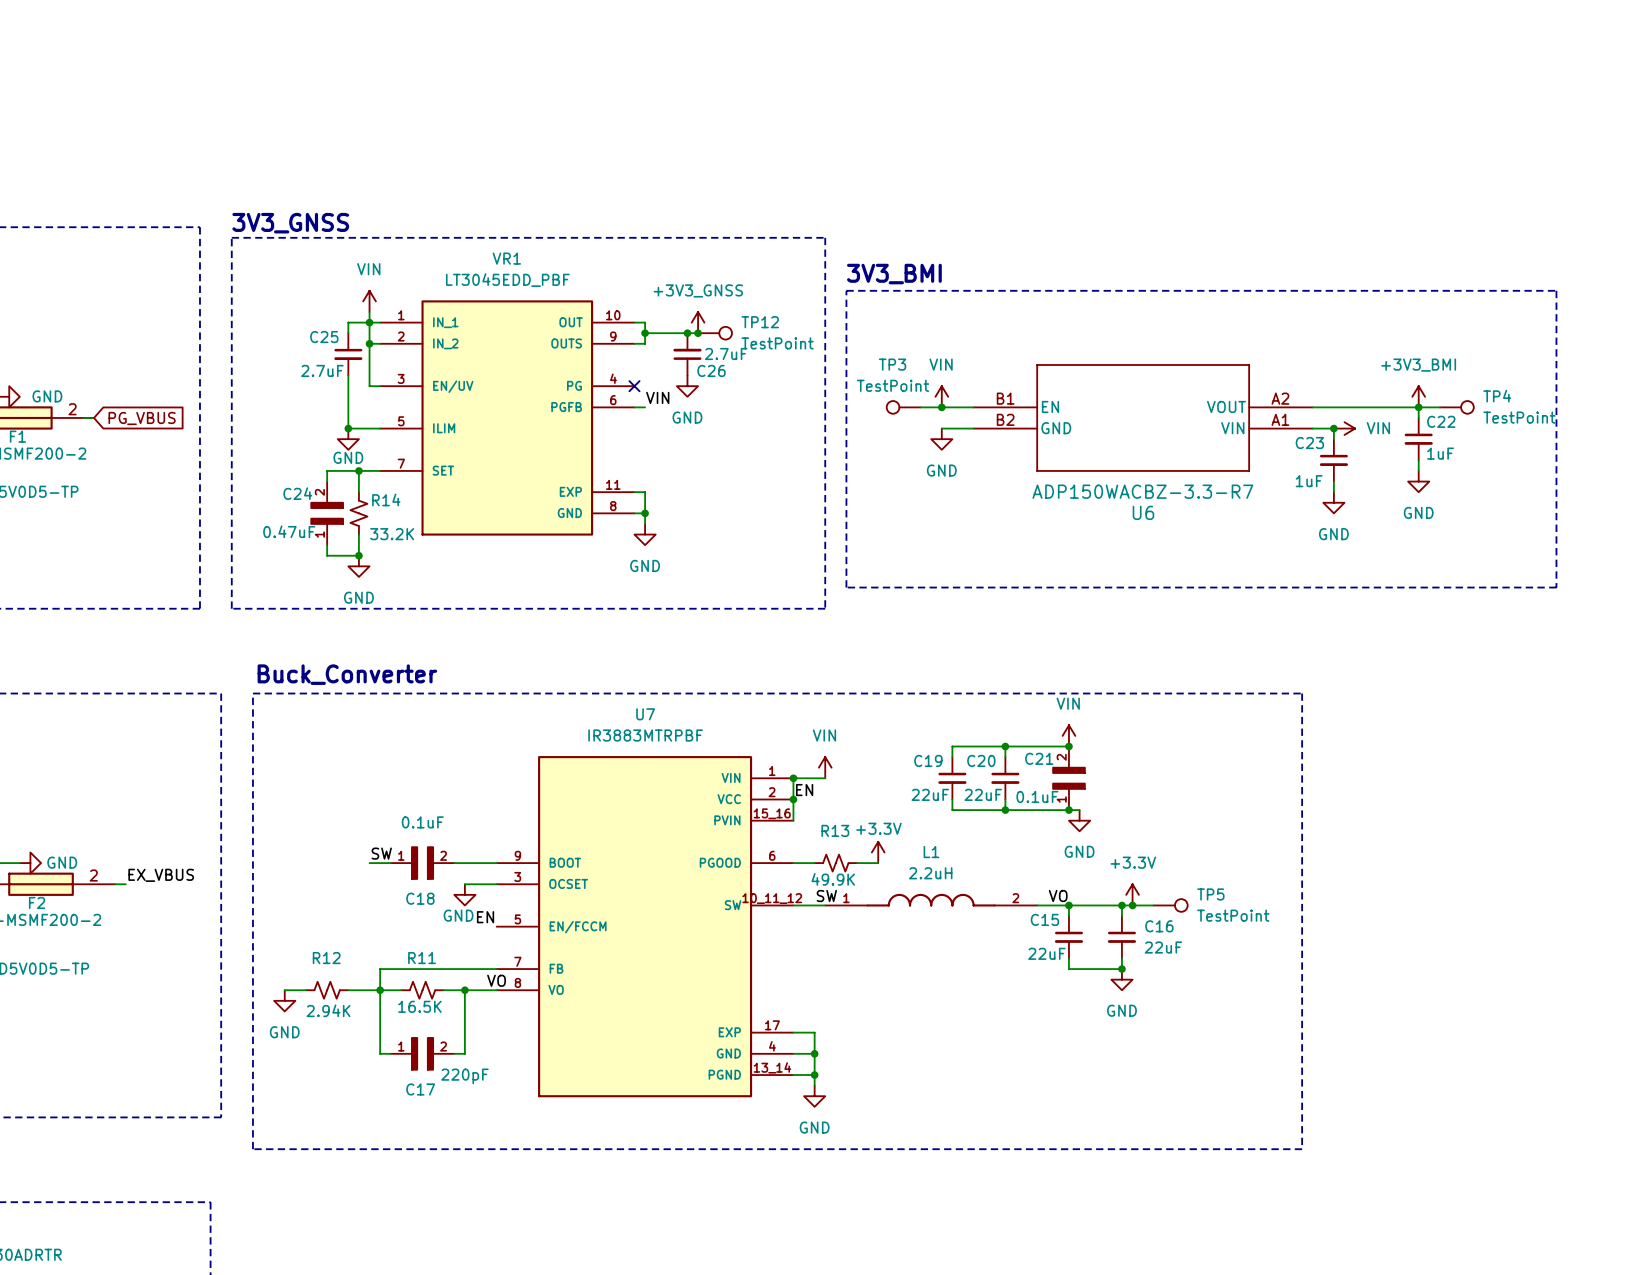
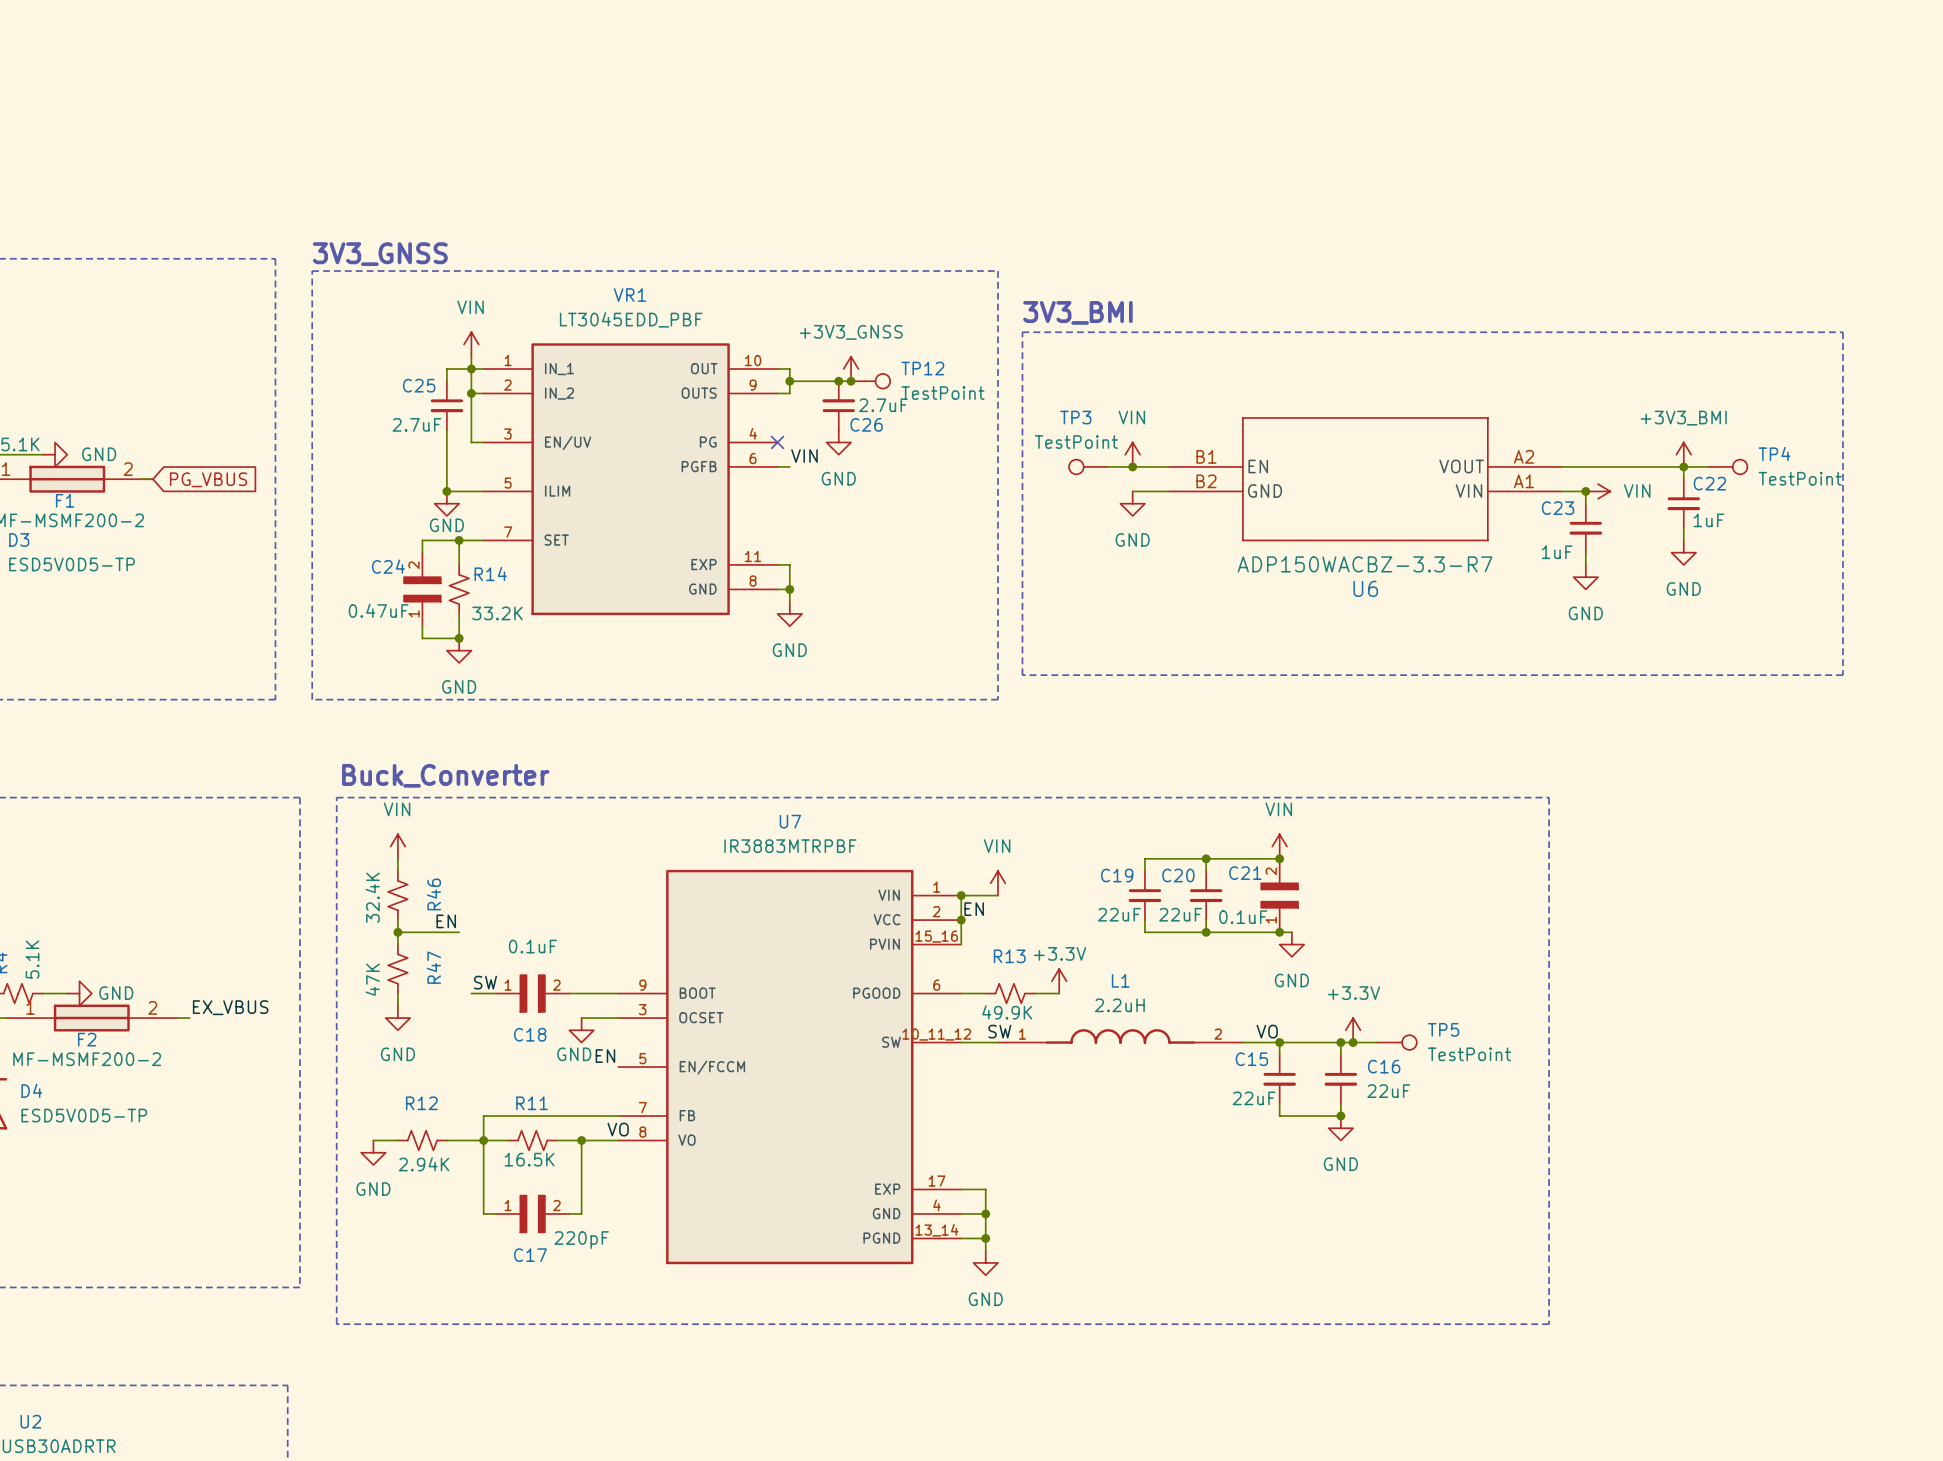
power symbol: none -> VIN (397, 846)
wire: none -> (397, 858) (397, 871)
R46: none -> 32.4K (397, 895)
wire: none -> (397, 920) (397, 944)
label: none -> EN (446, 921)
wire: none -> (397, 932) (459, 932)
junction: none -> (397, 932)
R47: none -> 47K (397, 969)
wire: none -> (397, 993) (397, 1005)
power symbol: none -> GND (397, 1018)

